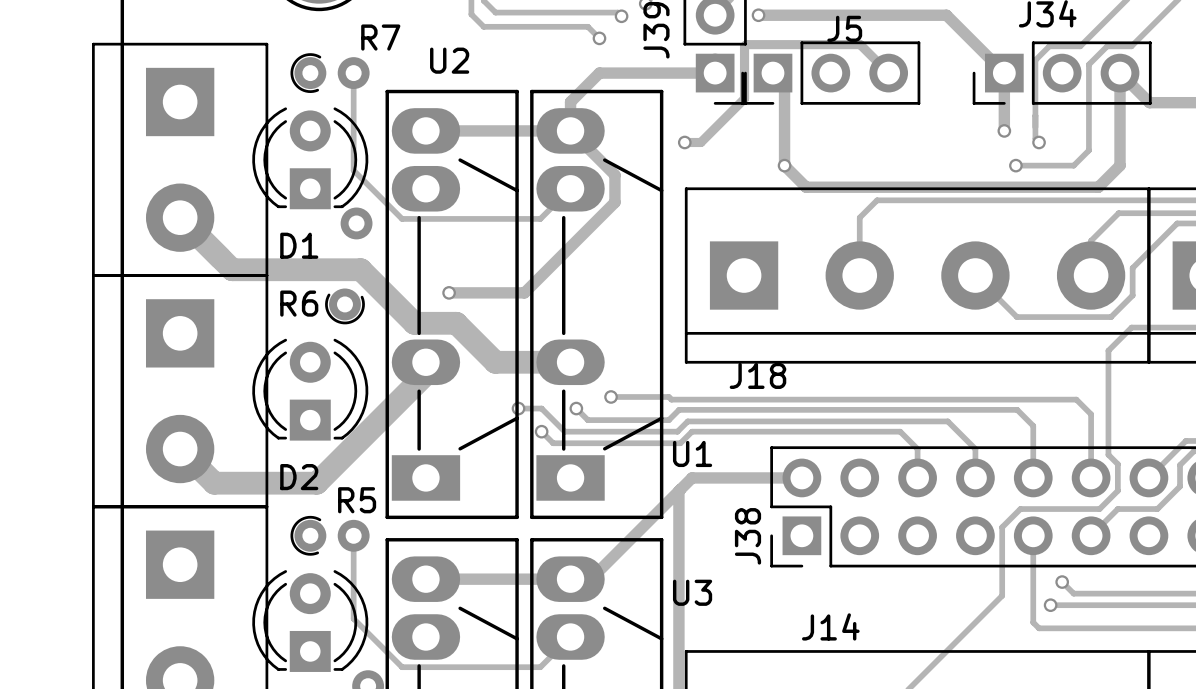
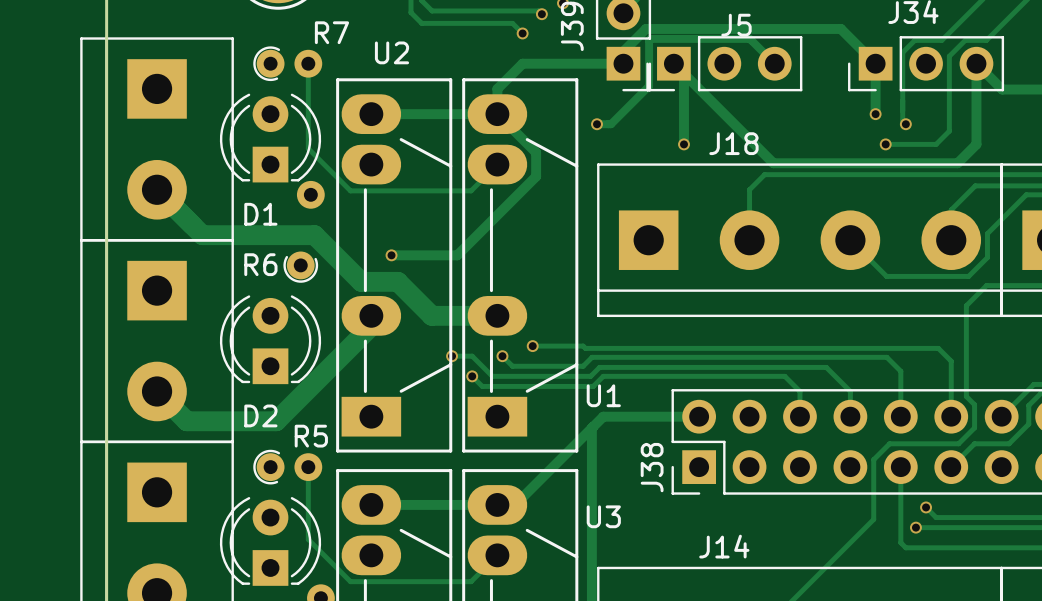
track: (758, 15) (946, 15) (964, 33) -> (623, 51) (646, 28) (840, 28)
via: (758, 15) -> none
track: (784, 165) (806, 187) (887, 187) -> (684, 73) (773, 163)
J18 name position: J18 (757, 375) -> J18 (733, 143)

